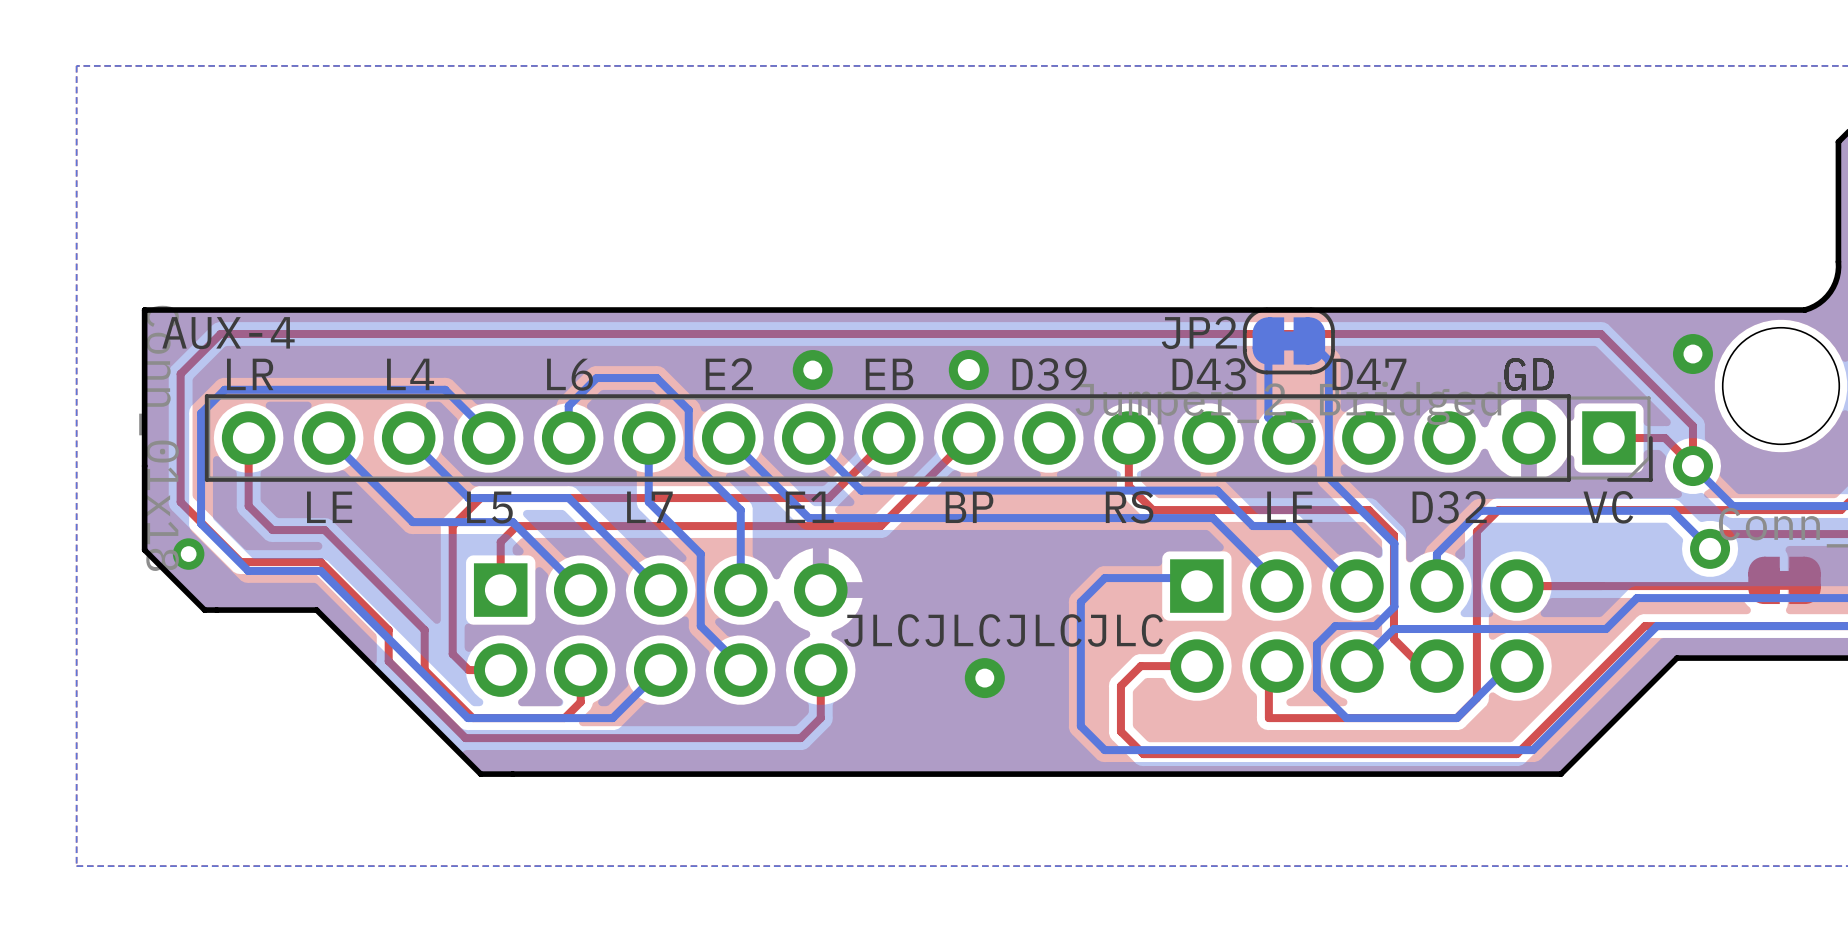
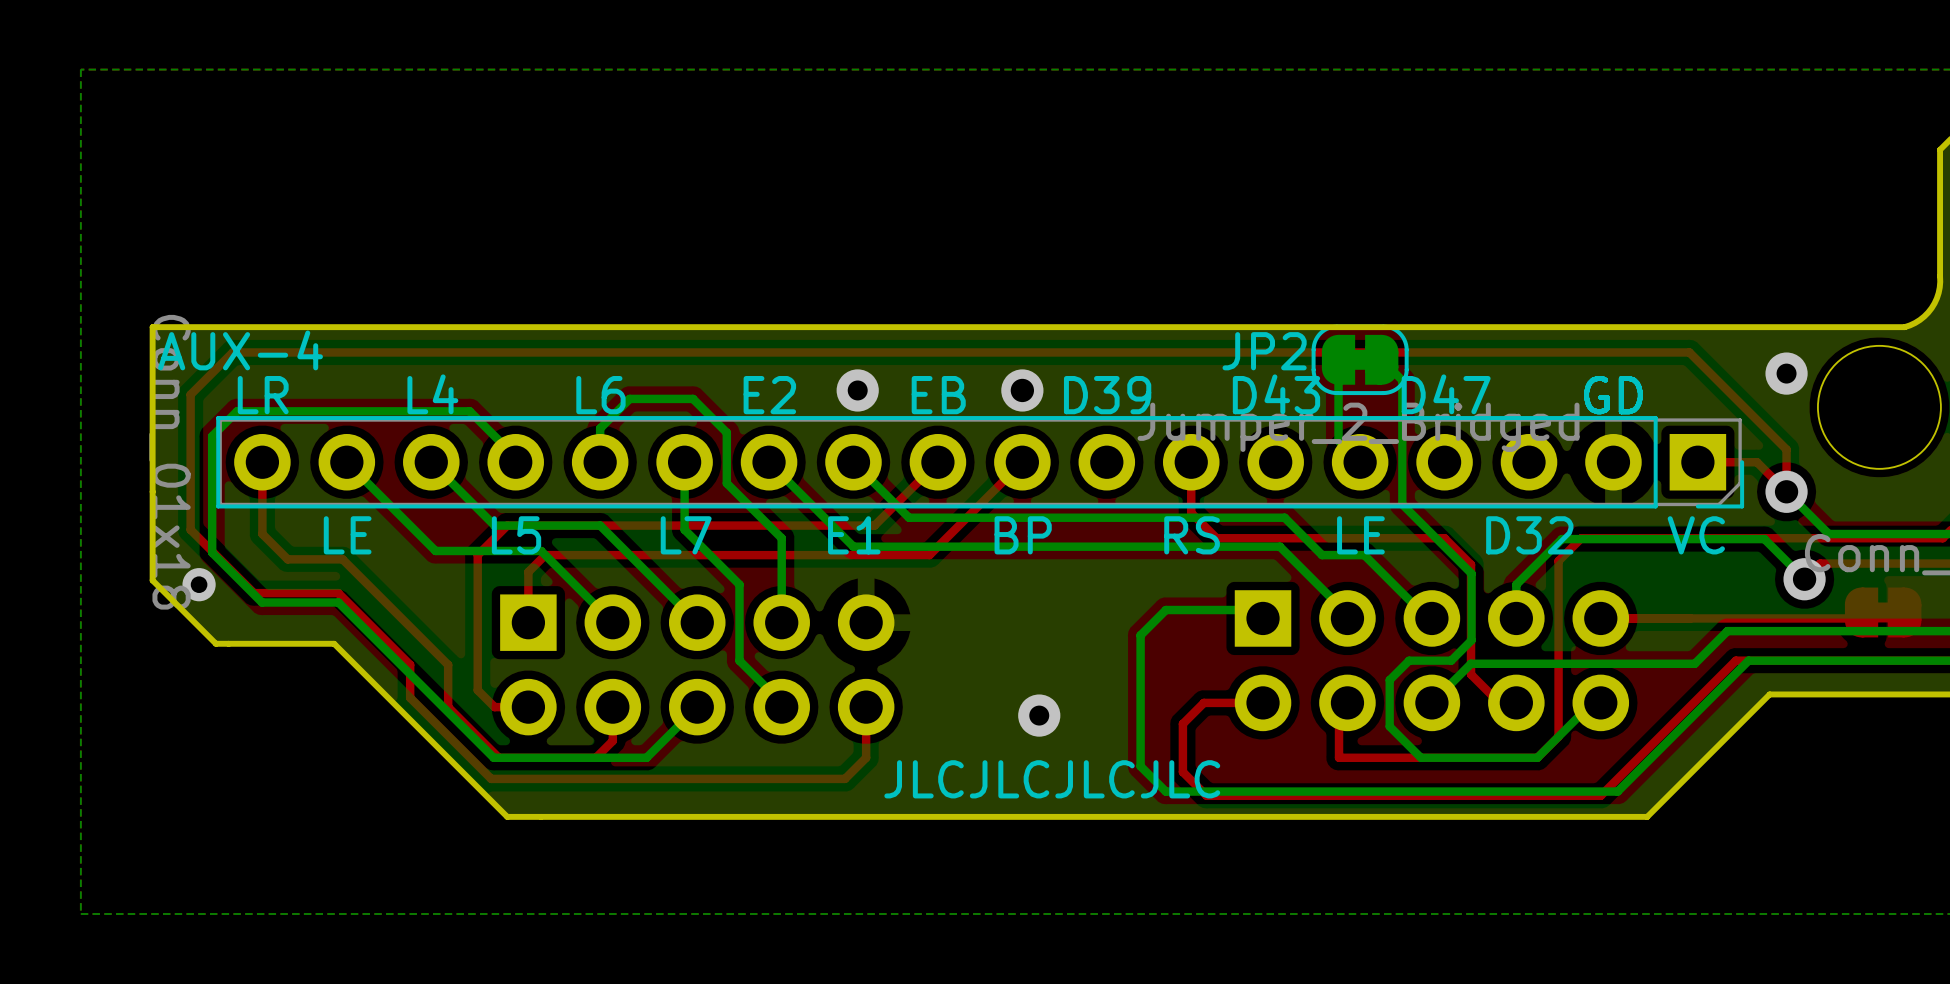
text position: JLCJLCJLCJLC (1003, 630) -> JLCJLCJLCJLC (1052, 779)

